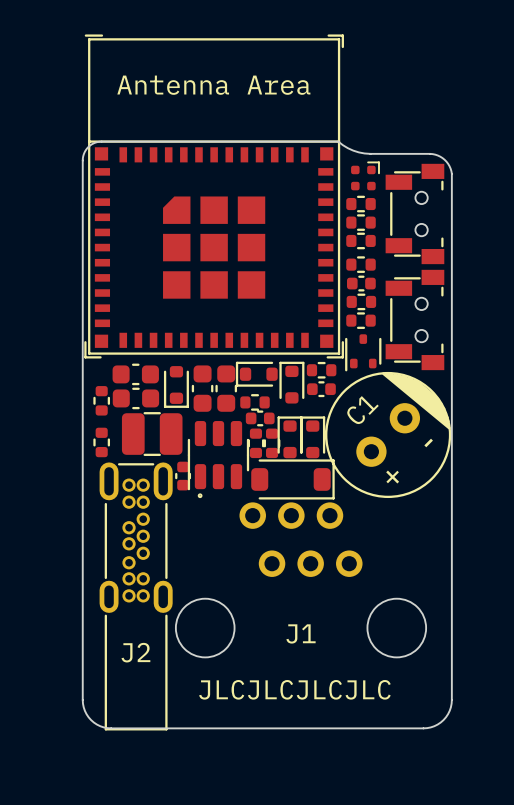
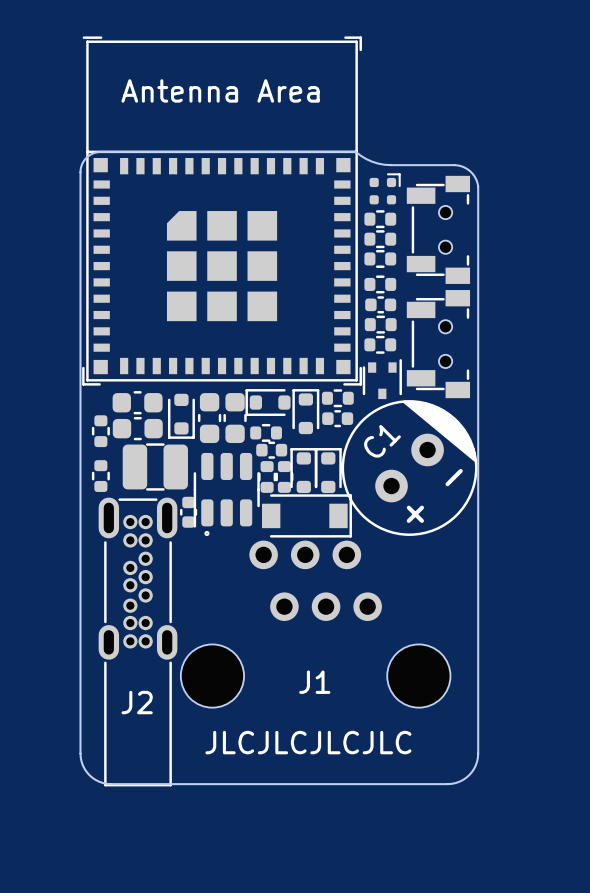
part footprint: [345, 334, 382, 372] -> [362, 359, 402, 400]
part footprint: [251, 459, 335, 500] -> [262, 494, 352, 538]

